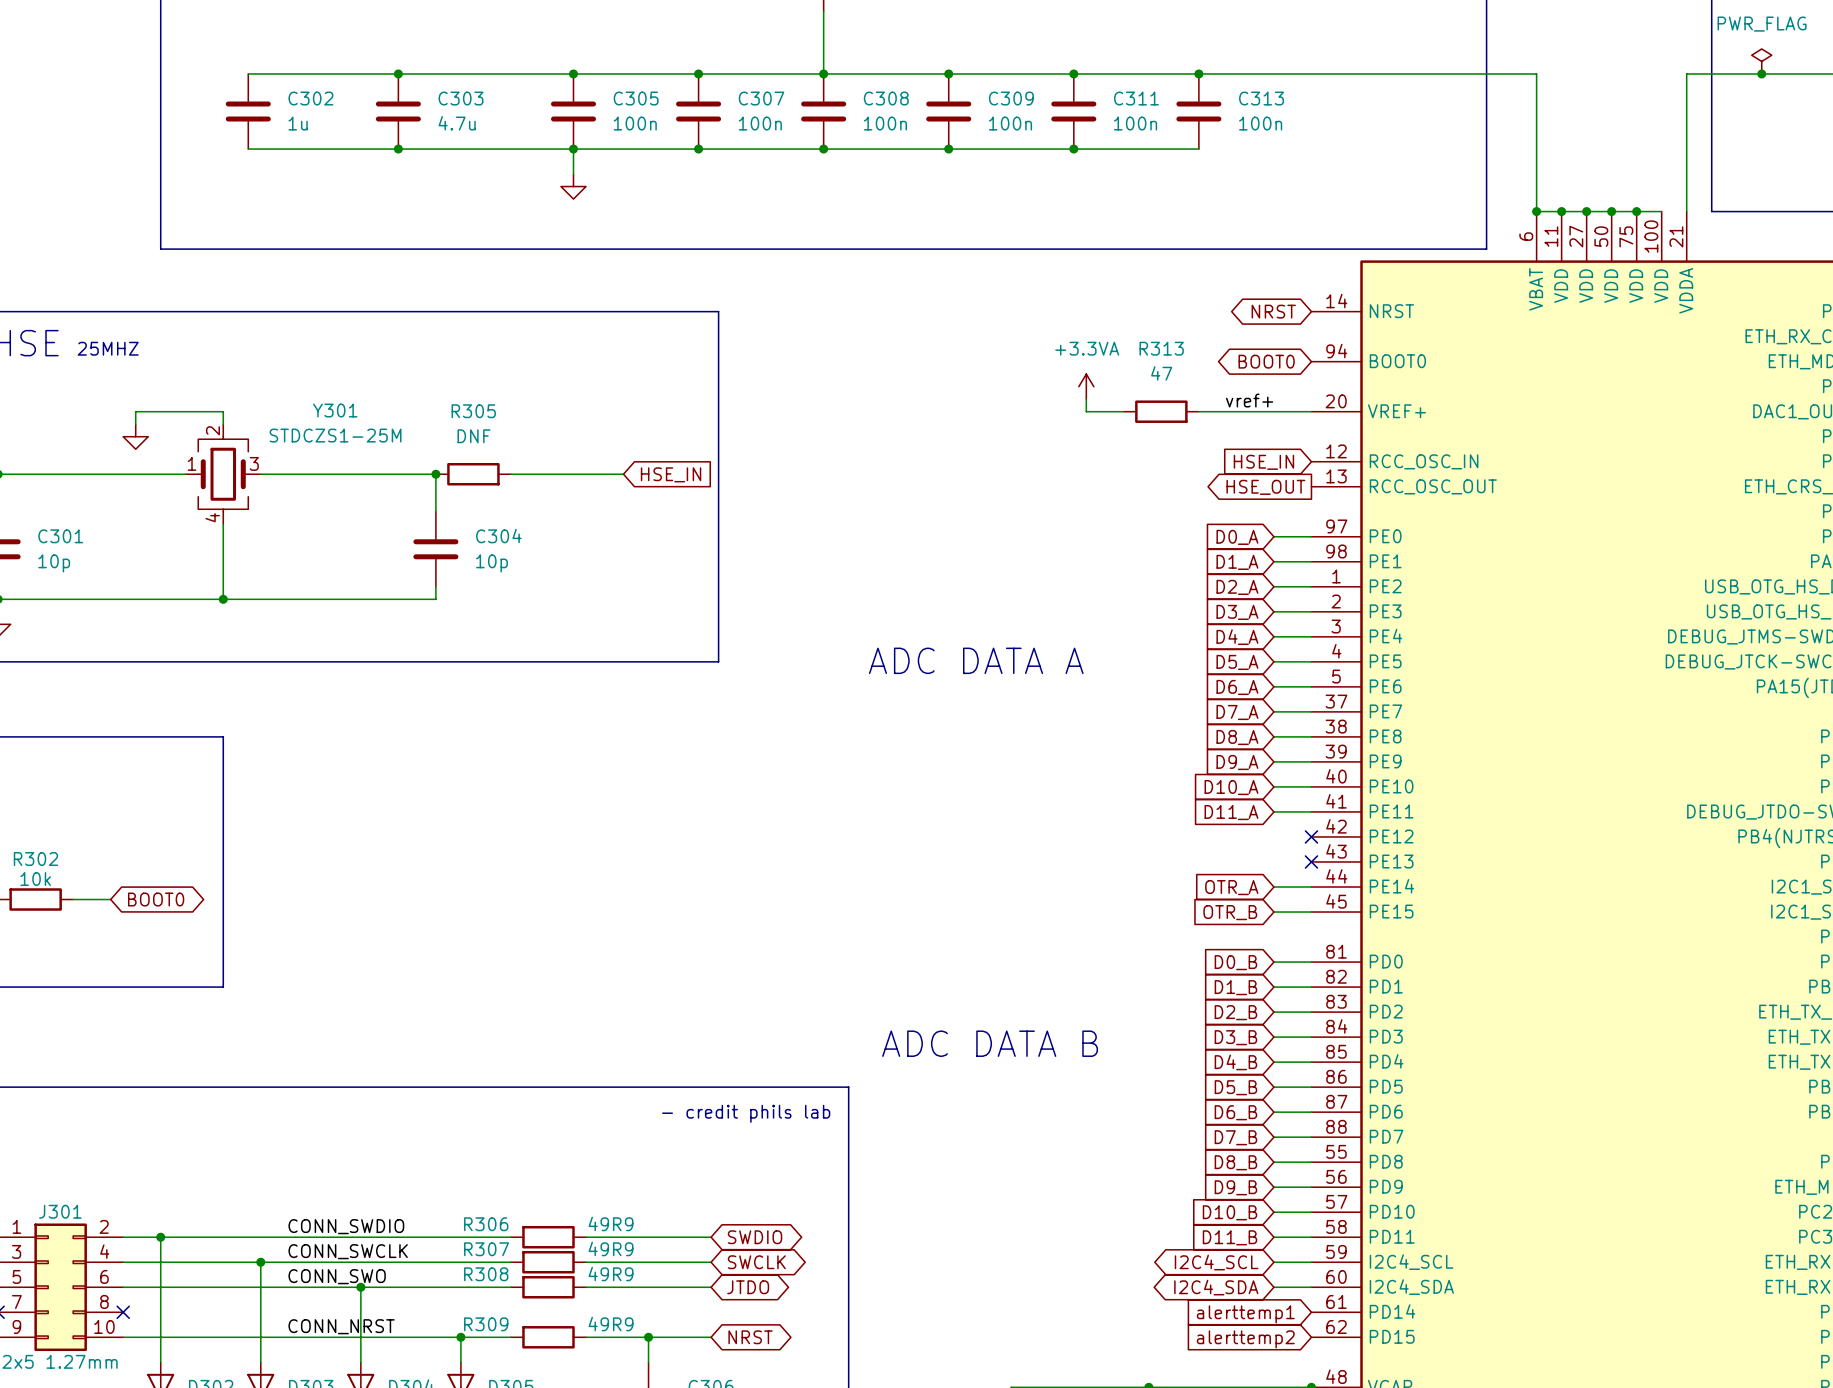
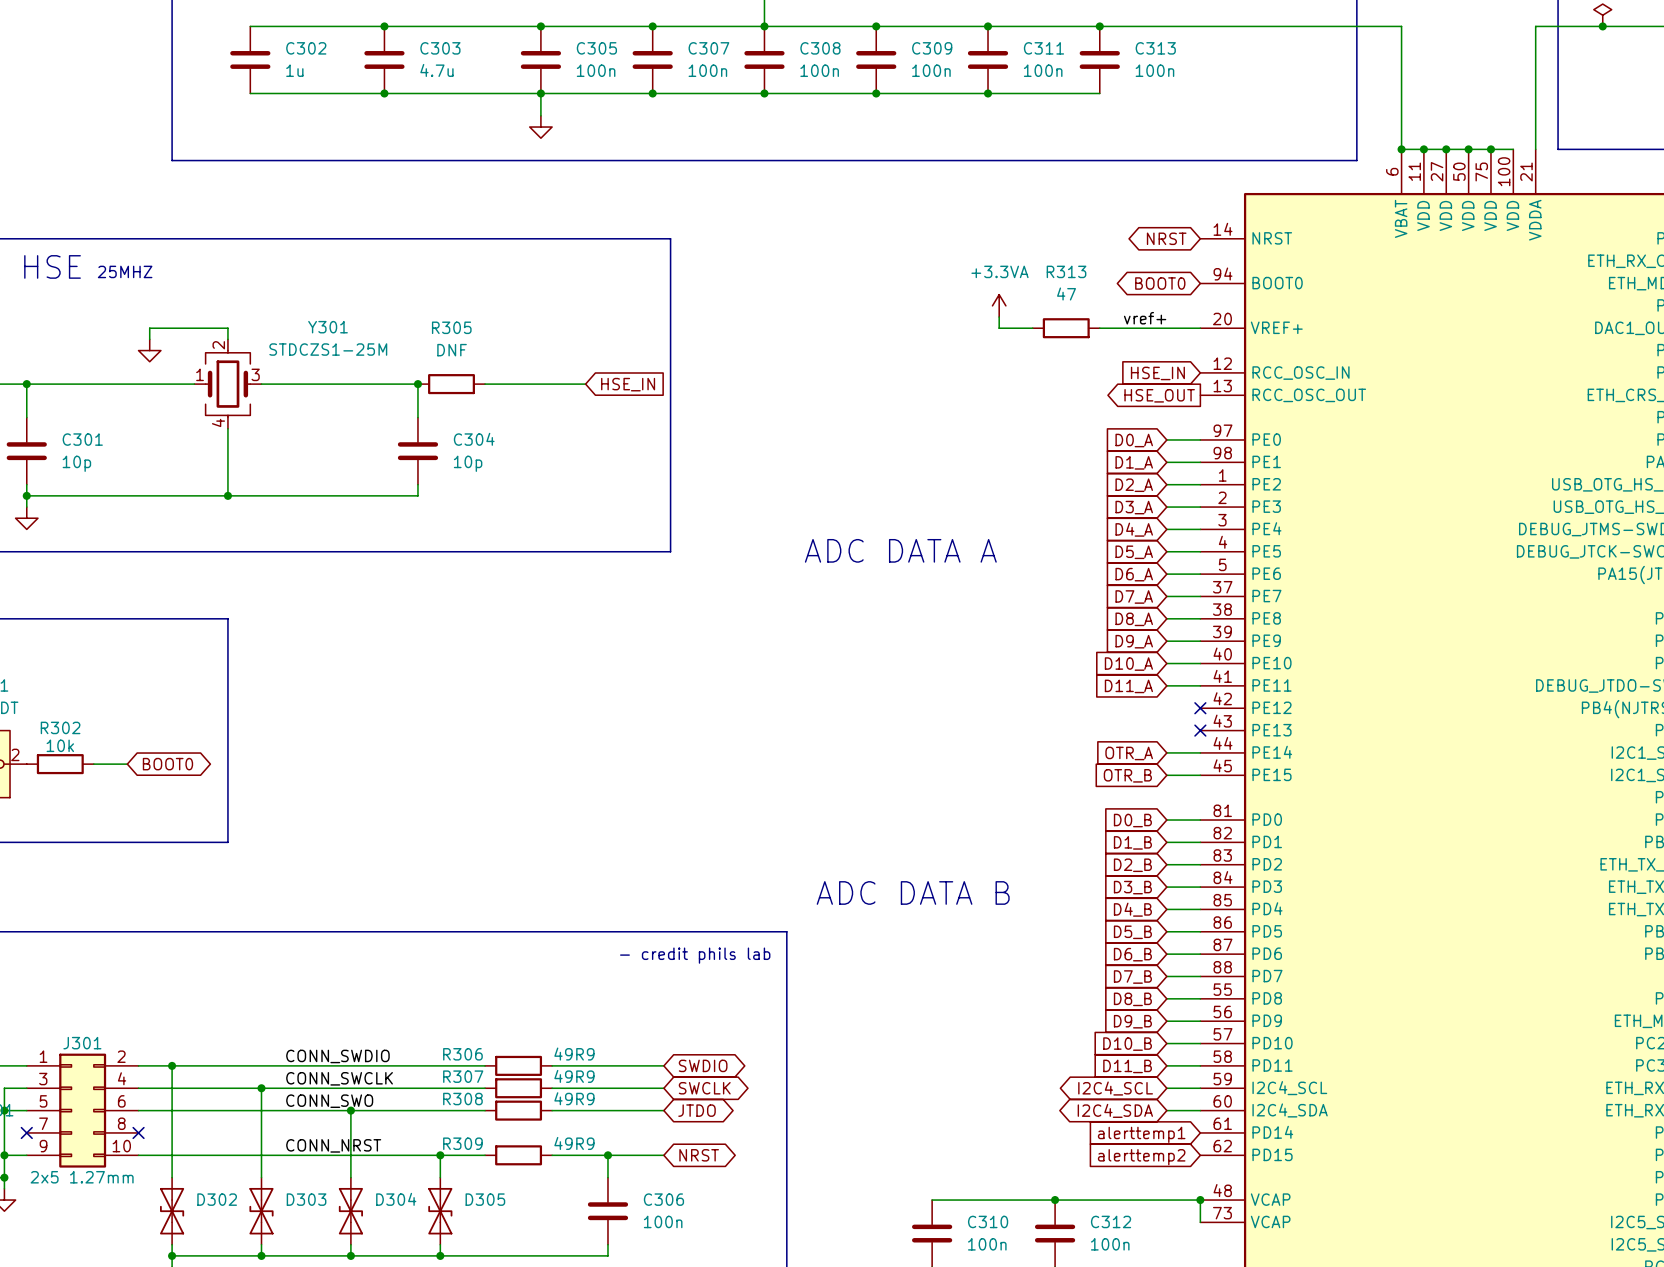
line: (160, 224) (160, 249) (1486, 249) (1486, 224) -> (172, 160) (1356, 160)

